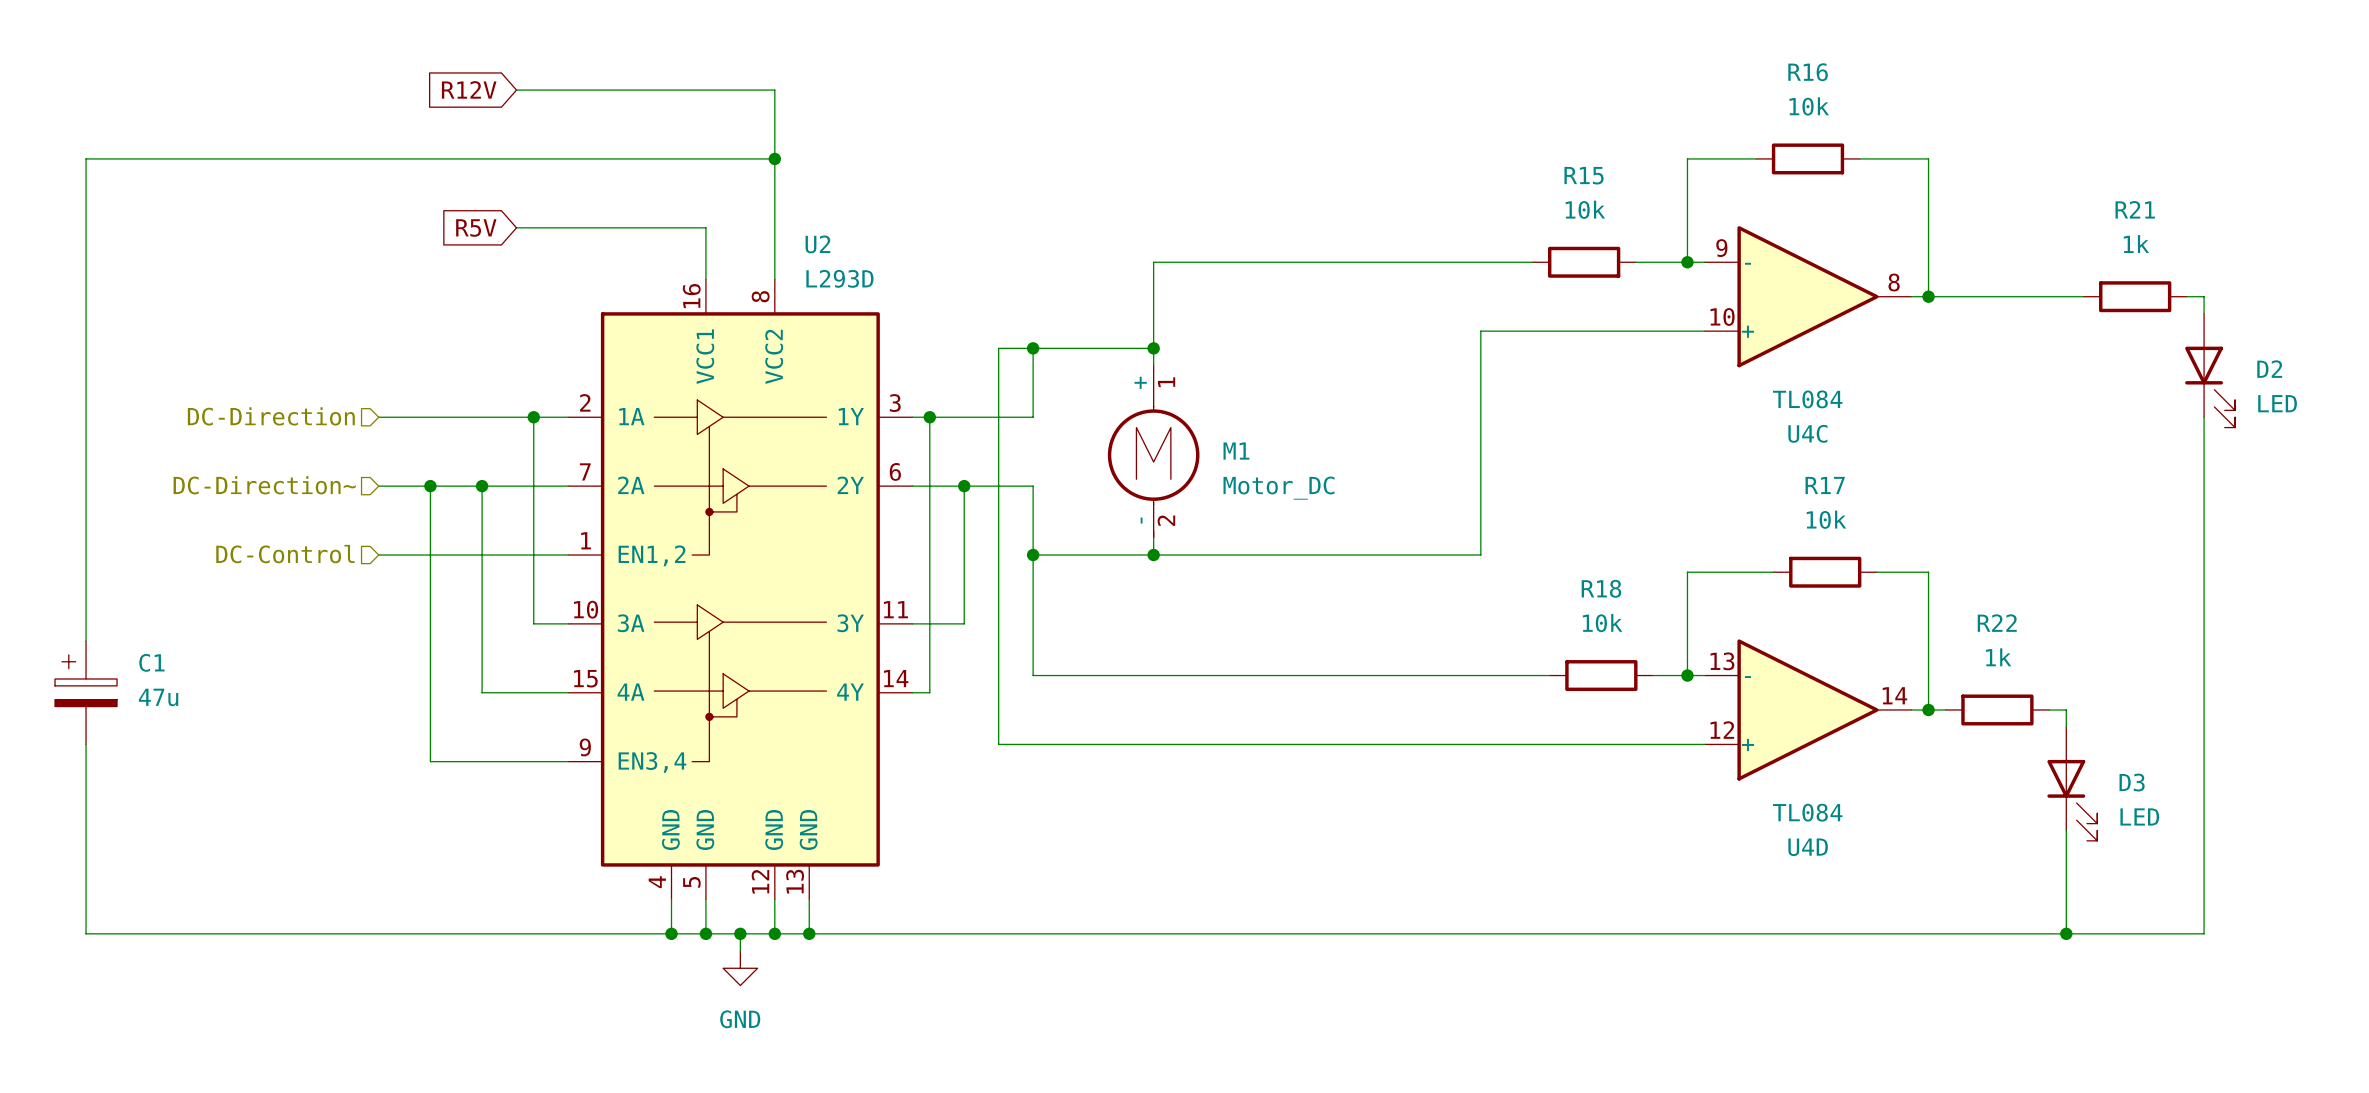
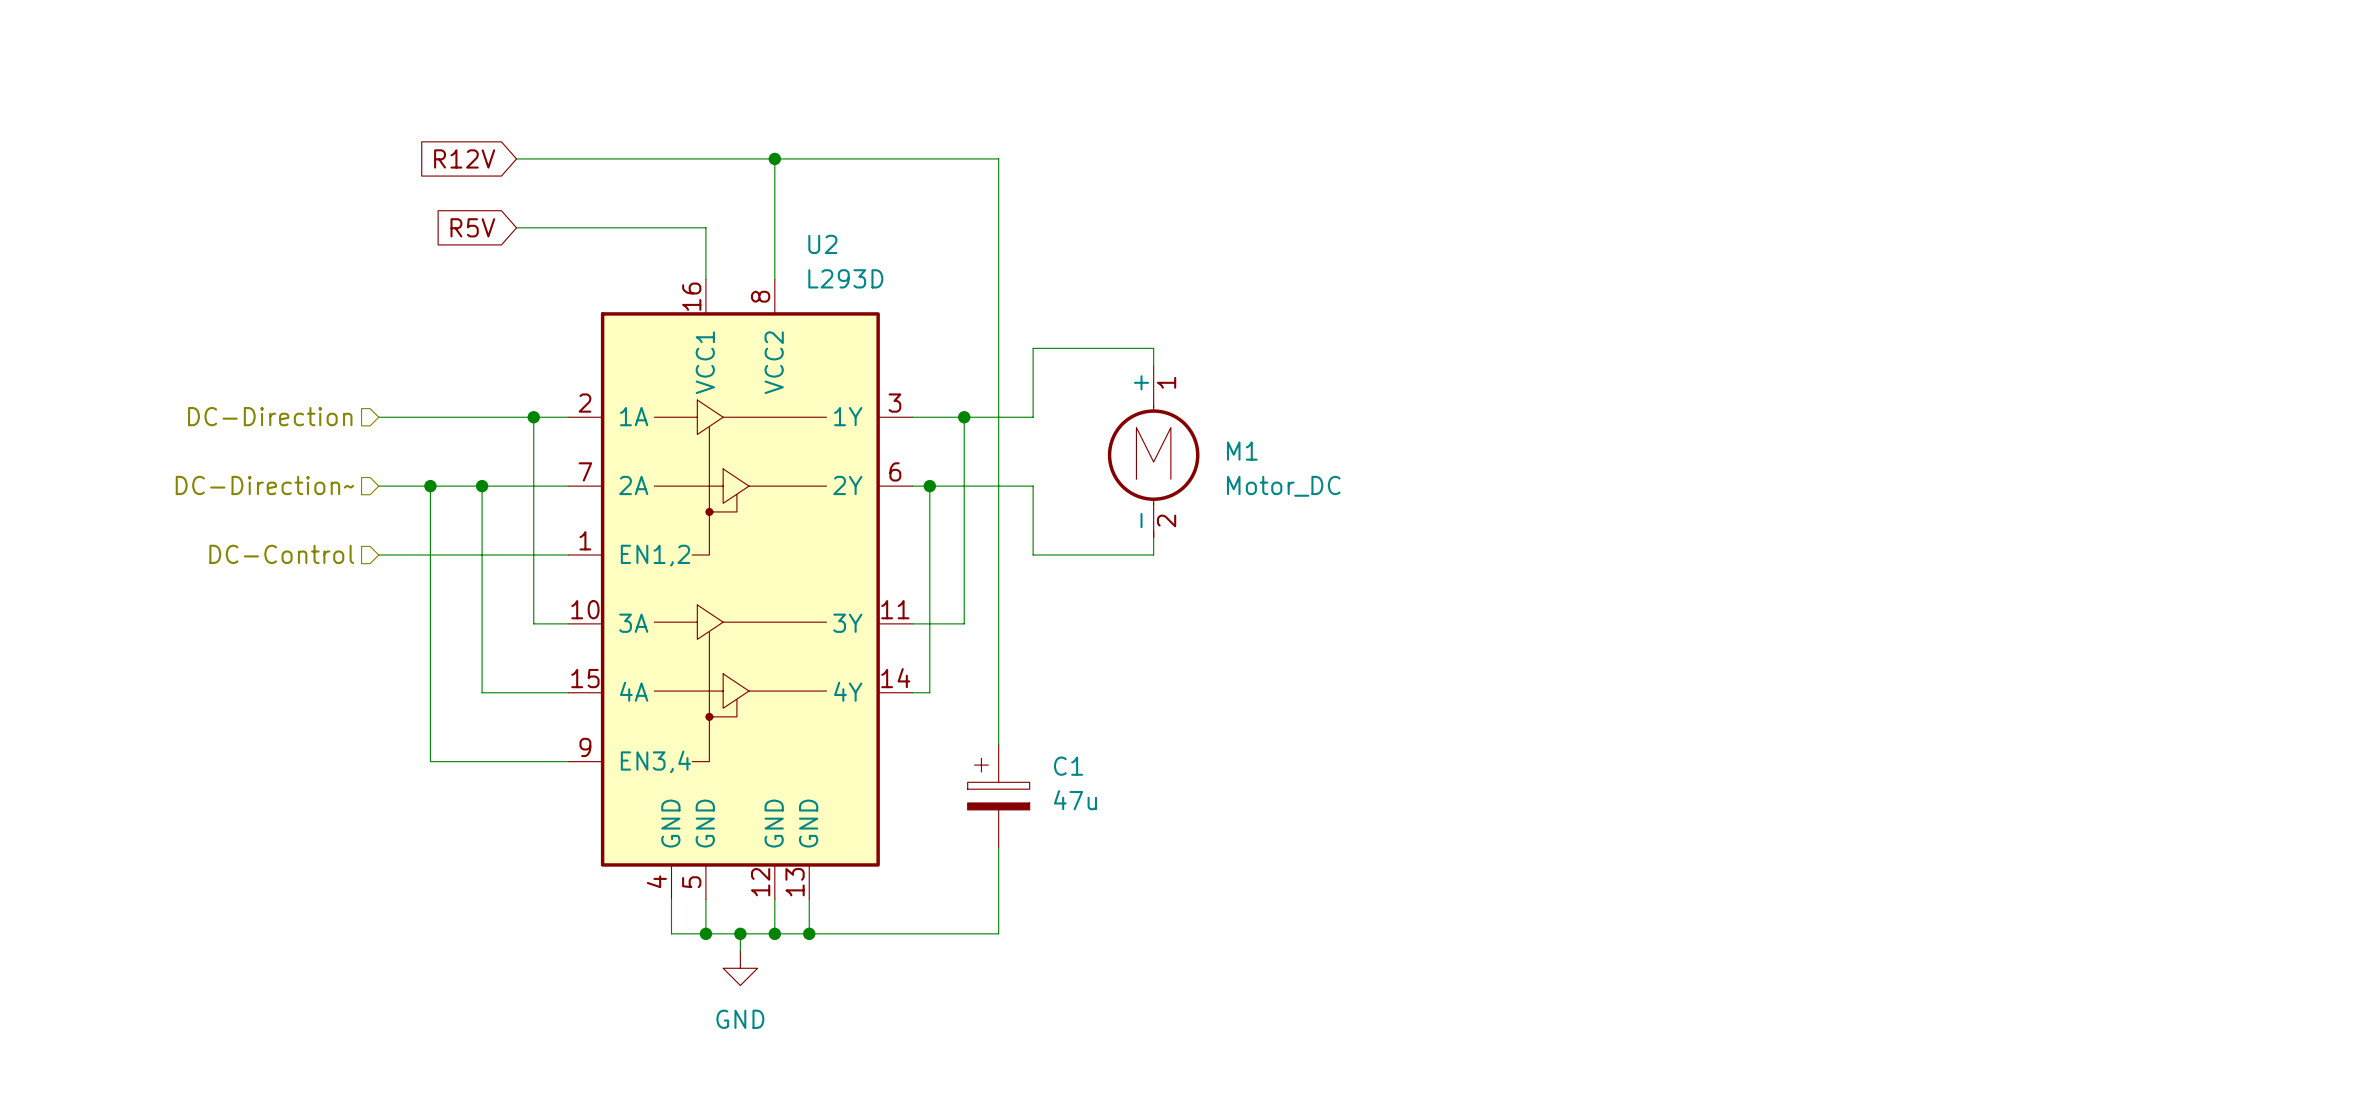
global label position: R12V (469, 89) -> R12V (464, 158)
wire: (516, 90) (774, 90) (774, 158) -> none
wire: (516, 158) (86, 158) (86, 641) -> none
wire: (1756, 158) (1687, 158) (1687, 262) -> none
R16: 10k (1808, 158) -> none
wire: (1859, 158) (1928, 158) (1928, 296) -> none
wire: (1532, 262) (1153, 262) (1153, 348) -> none
R15: 10k (1584, 262) -> none
wire: (1635, 262) (1704, 262) -> none
junction: (1687, 262) -> none
U4C: TL084 (1808, 296) -> none
wire: (1911, 296) (2083, 296) -> none
junction: (1928, 296) -> none
R21: 1k (2135, 296) -> none
wire: (2186, 296) (2204, 296) (2204, 313) -> none
wire: (1704, 331) (1480, 331) (1480, 555) (1153, 555) -> none
wire: (998, 348) (1033, 348) -> (998, 348) (998, 158) (774, 158)
junction: (1033, 348) -> none
junction: (1153, 348) -> none
D2: LED (2210, 370) -> none
wire: (929, 417) (929, 486) -> (964, 417) (964, 486)
junction: (929, 417) -> none
junction: none -> (964, 417)
wire: (2204, 417) (2204, 933) (998, 933) -> (998, 847) (998, 933)
junction: none -> (929, 486)
junction: (964, 486) -> none
wire: (1033, 555) (1033, 675) (1549, 675) -> none
junction: (1033, 555) -> none
junction: (1153, 555) -> none
wire: (1773, 572) (1687, 572) (1687, 675) -> none
R17: 10k (1825, 572) -> none
wire: (1876, 572) (1928, 572) (1928, 709) -> none
R18: 10k (1601, 675) -> none
wire: (1653, 675) (1704, 675) -> none
junction: (1687, 675) -> none
C1 position: (86, 692) -> (998, 796)
U4D: TL084 (1808, 709) -> none
wire: (1911, 709) (1945, 709) -> none
junction: (1928, 709) -> none
R22: 1k (1997, 709) -> none
wire: (2049, 709) (2066, 709) (2066, 727) -> none
wire: (86, 744) (86, 933) (671, 933) -> none
wire: (998, 744) (1704, 744) -> none
D3: LED (2072, 784) -> none
wire: (2066, 830) (2066, 933) -> none
junction: (671, 933) -> none
junction: (2066, 933) -> none

